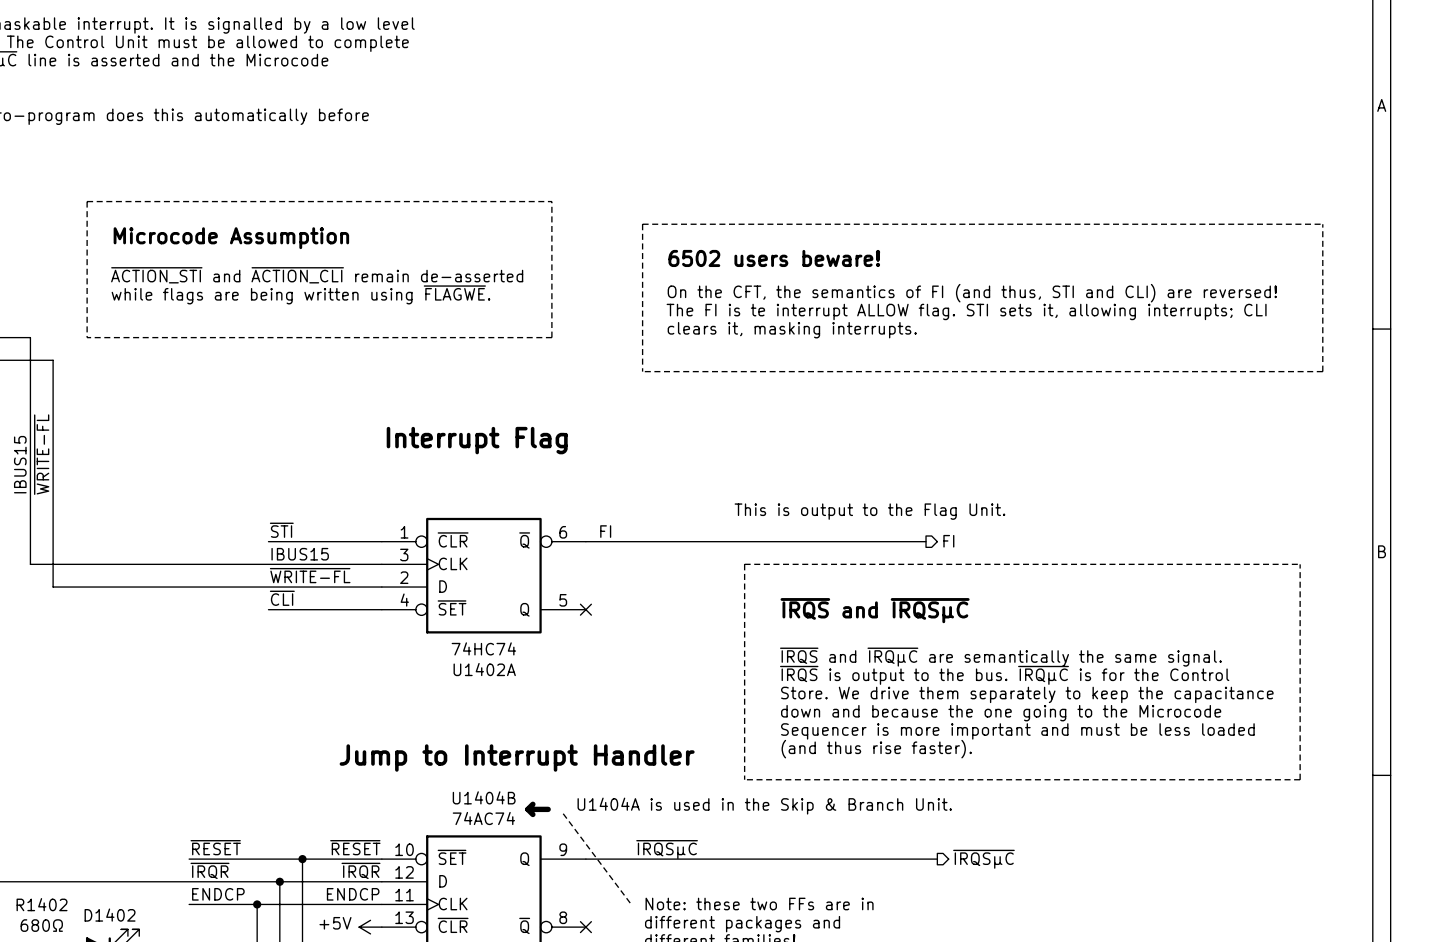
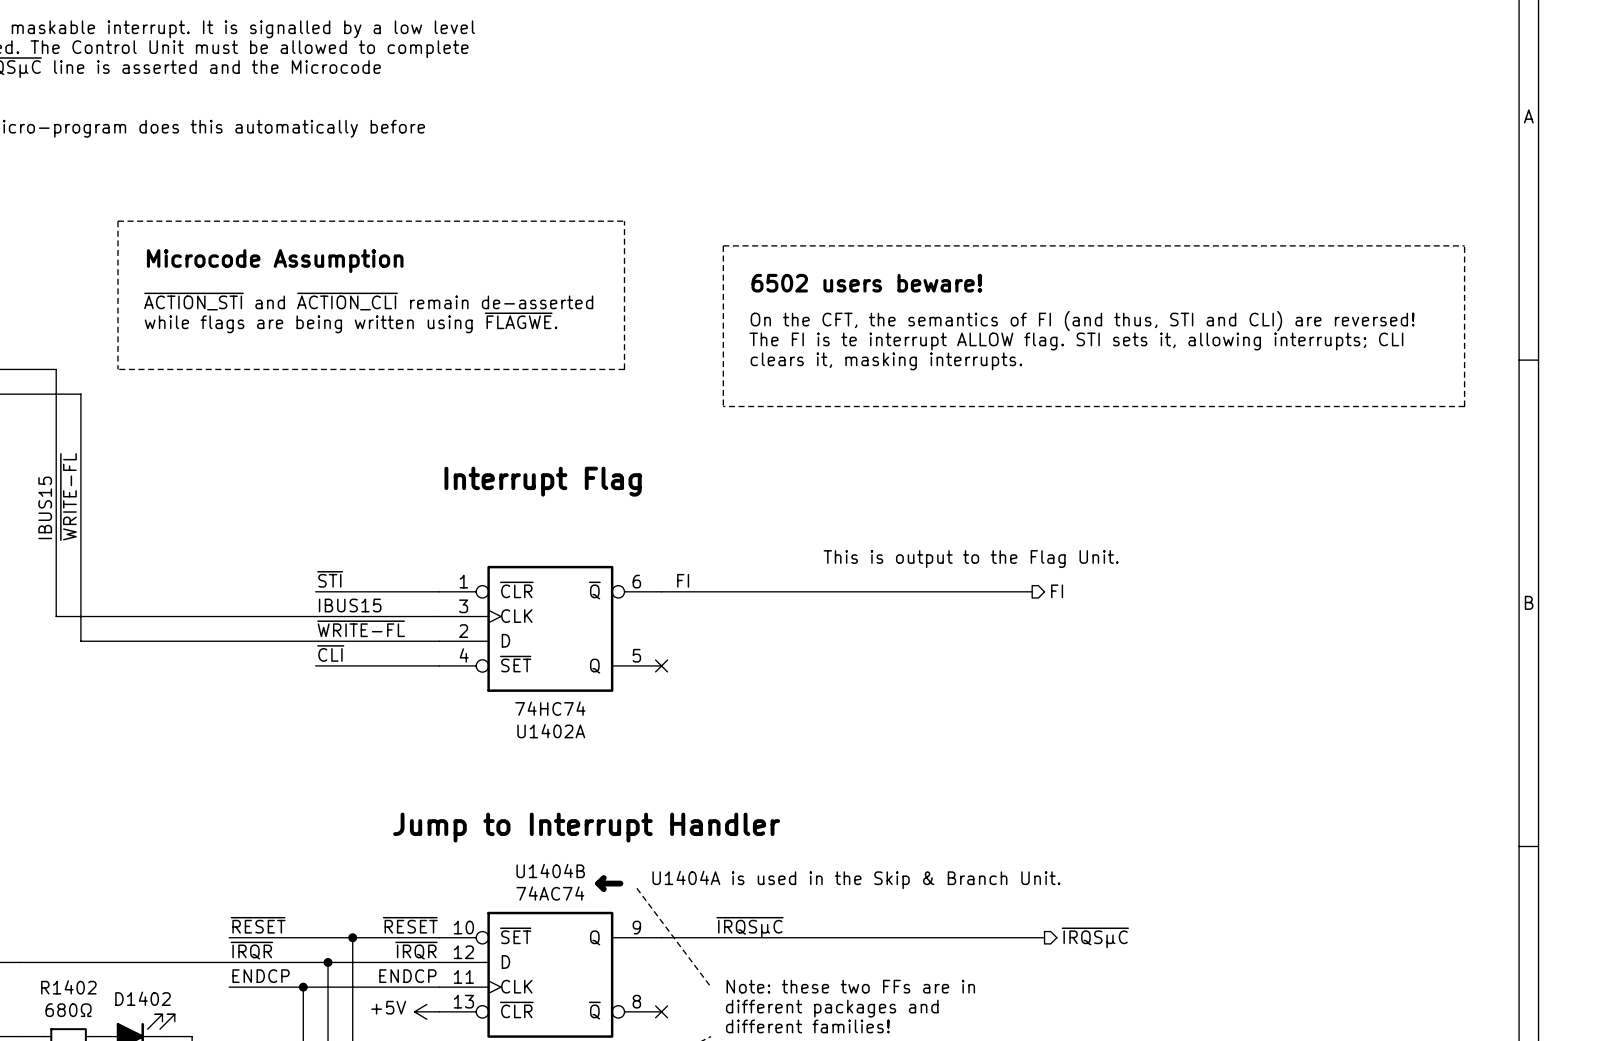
line: (744, 564) (1300, 564) (1300, 779) (744, 779) (744, 564) -> none
text: ~{IRQS} and ~{IRQSµC} (875, 610) -> none
text: ~{IRQS} and ~{IRQµC} are semantically the same signal. (1000, 657) -> none
text: ~{IRQS} is output to the bus. ~{IRQµC} is for the Control (1004, 675) -> none
text: Store. We drive them separately to keep the capacitance (1027, 694) -> none
text: down and because the one going to the Microcode (1001, 713) -> none
text: Sequencer is more important and must be less loaded (1017, 731) -> none
text: (and thus rise faster). (876, 749) -> none

